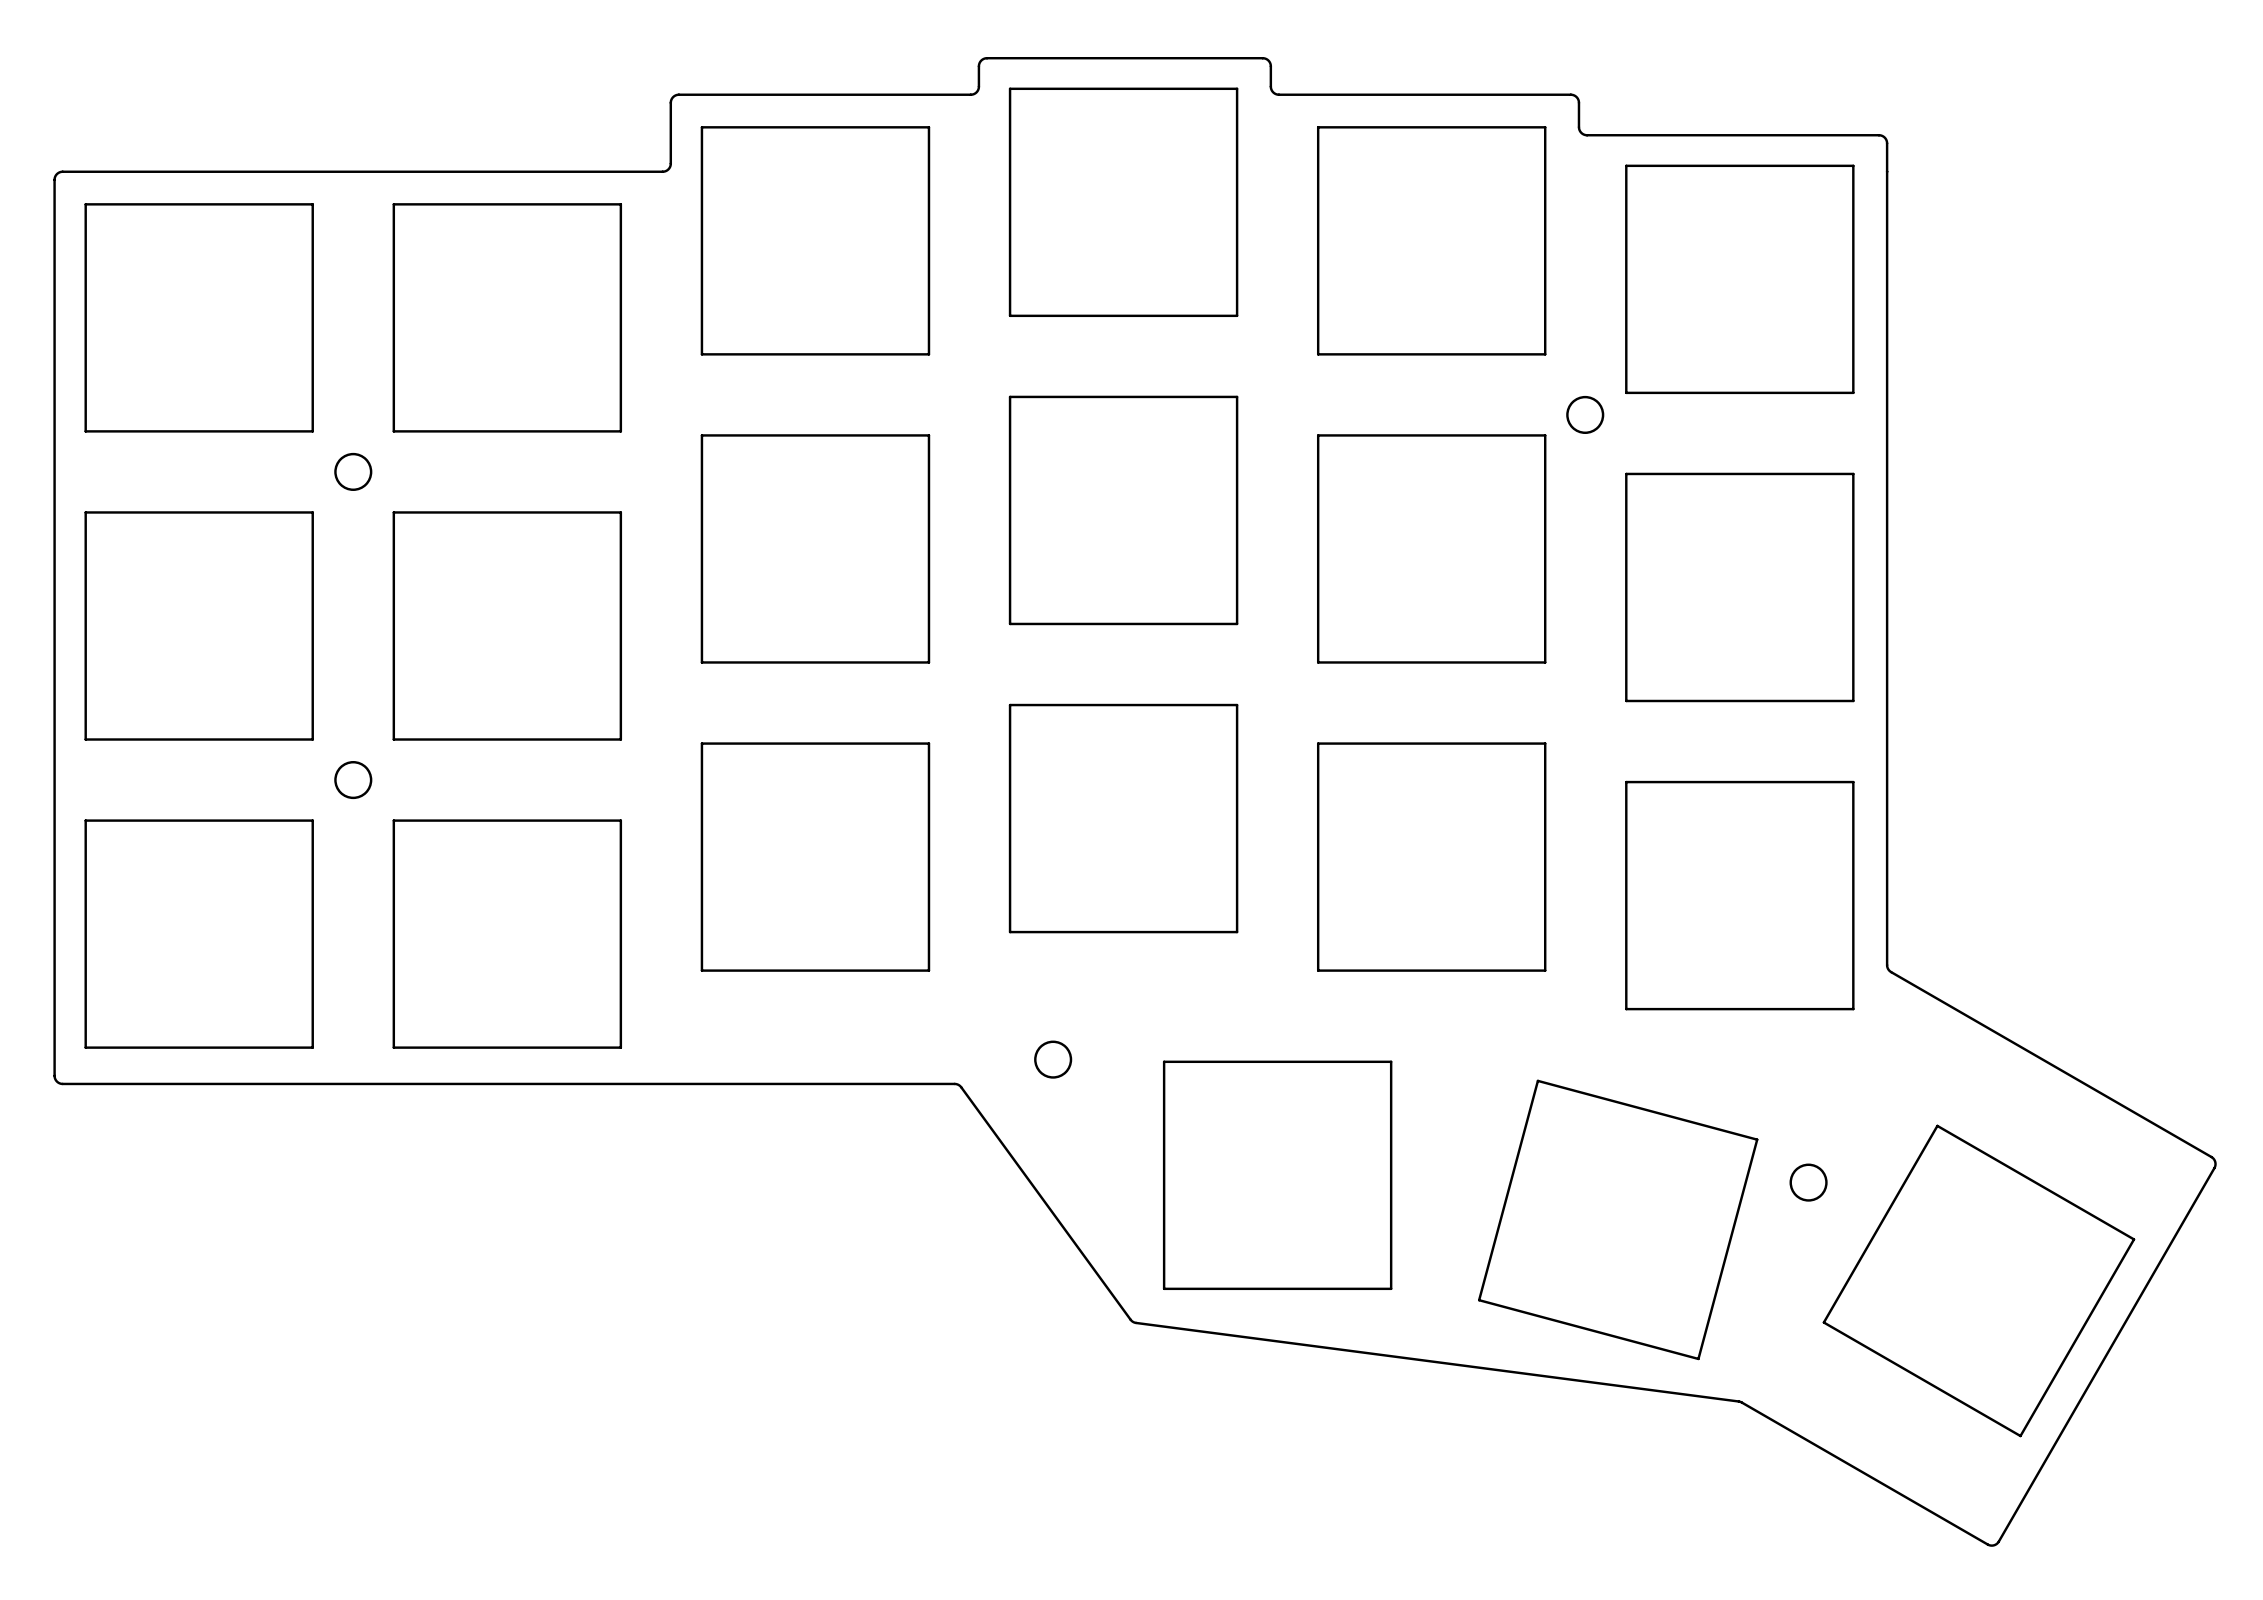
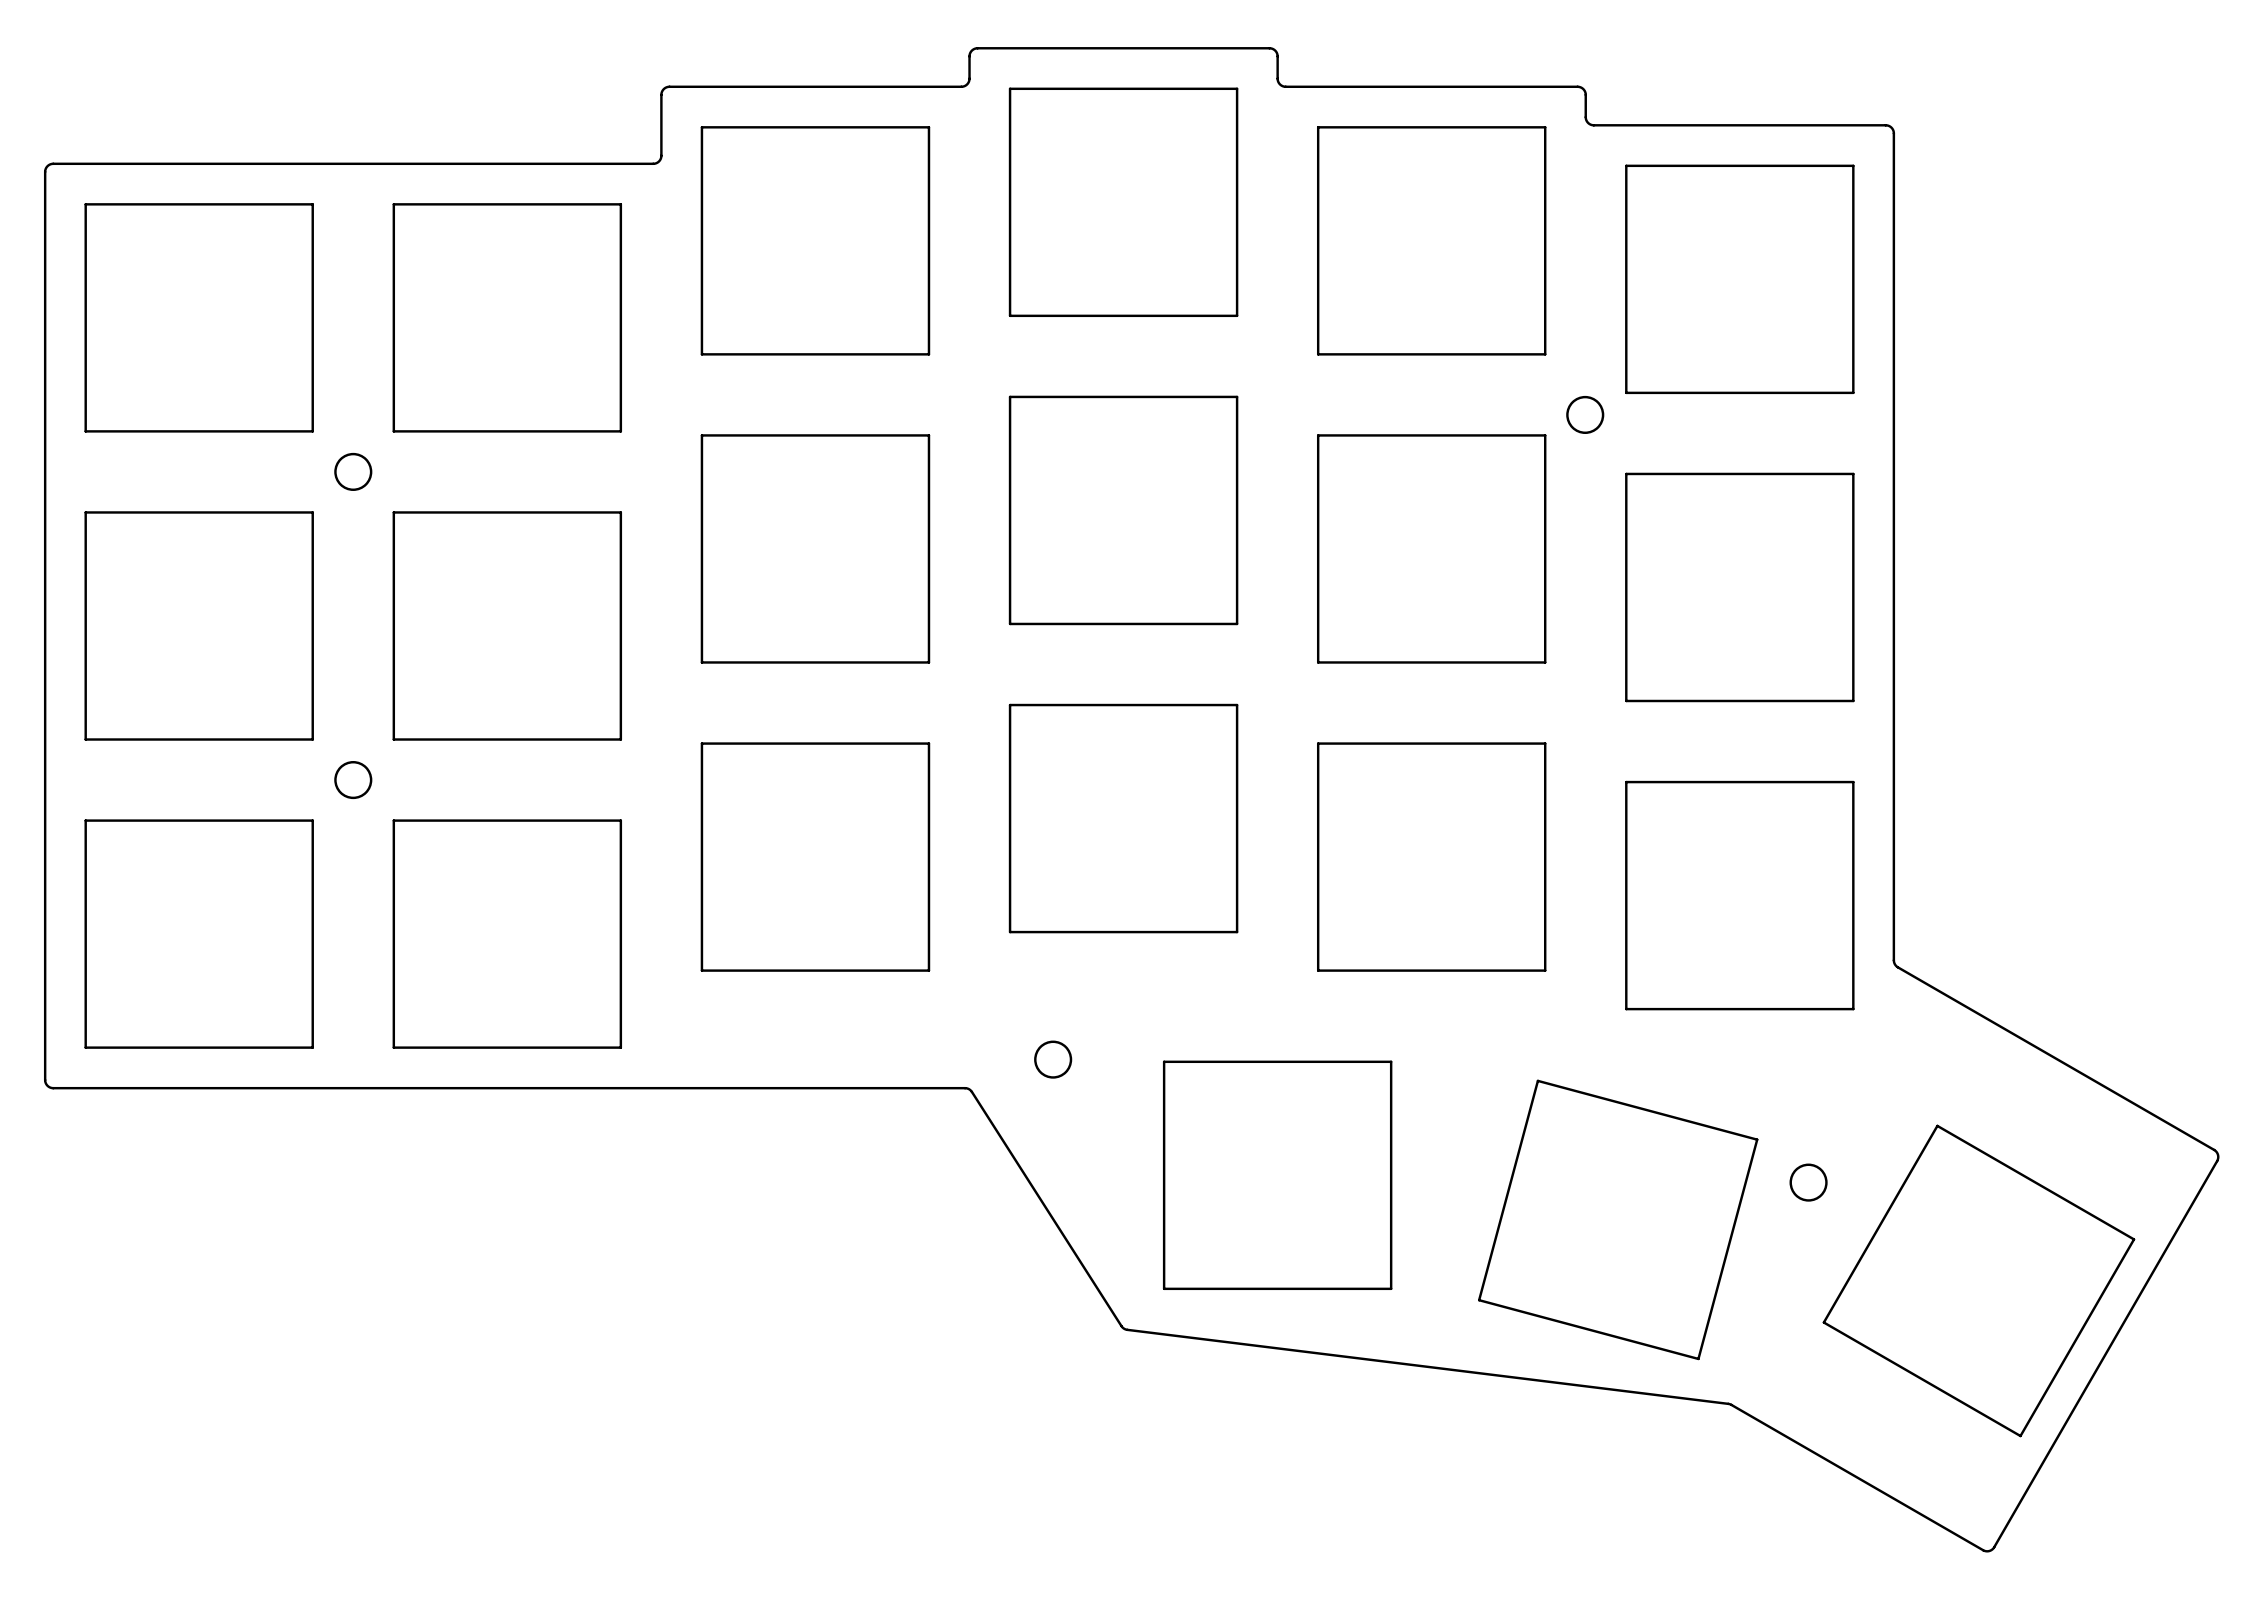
board edge: (1887, 171) (1887, 142) (1884, 137) (1880, 135) (1584, 134) (1579, 128) (1578, 100) (1571, 94) (1278, 94) (1271, 89) (1270, 64) (1263, 58) (987, 58) (979, 63) (978, 88) (971, 94) (675, 95) (670, 101) (670, 164) (668, 169) (663, 171) (59, 172) (54, 179) (55, 1079) (62, 1083) (956, 1084) (961, 1087) (1133, 1322) (1739, 1401) (1987, 1544) (1995, 1544) (2214, 1168) (2215, 1162) (2211, 1157) (1891, 972) (1887, 967) (1887, 171) -> (977, 48) (970, 53) (969, 80) (962, 86) (666, 87) (661, 93) (661, 156) (659, 161) (654, 163) (53, 163) (47, 166) (45, 171) (45, 1080) (46, 1084) (53, 1088) (967, 1088) (971, 1091) (1124, 1329) (1729, 1404) (1983, 1550) (1991, 1549) (2217, 1161) (2218, 1155) (2214, 1149) (1897, 967) (1894, 962) (1893, 133) (1892, 128) (1885, 125) (1592, 125) (1586, 120) (1585, 92) (1578, 86) (1284, 86) (1278, 81) (1277, 54) (1270, 48) (977, 48)

